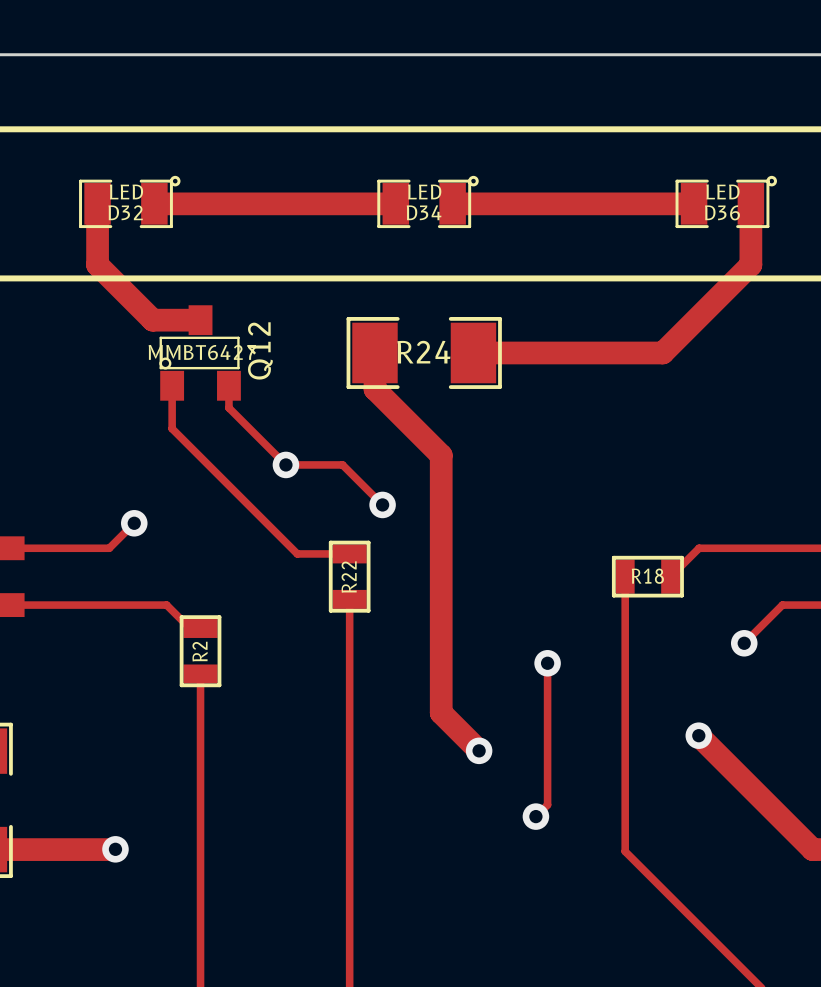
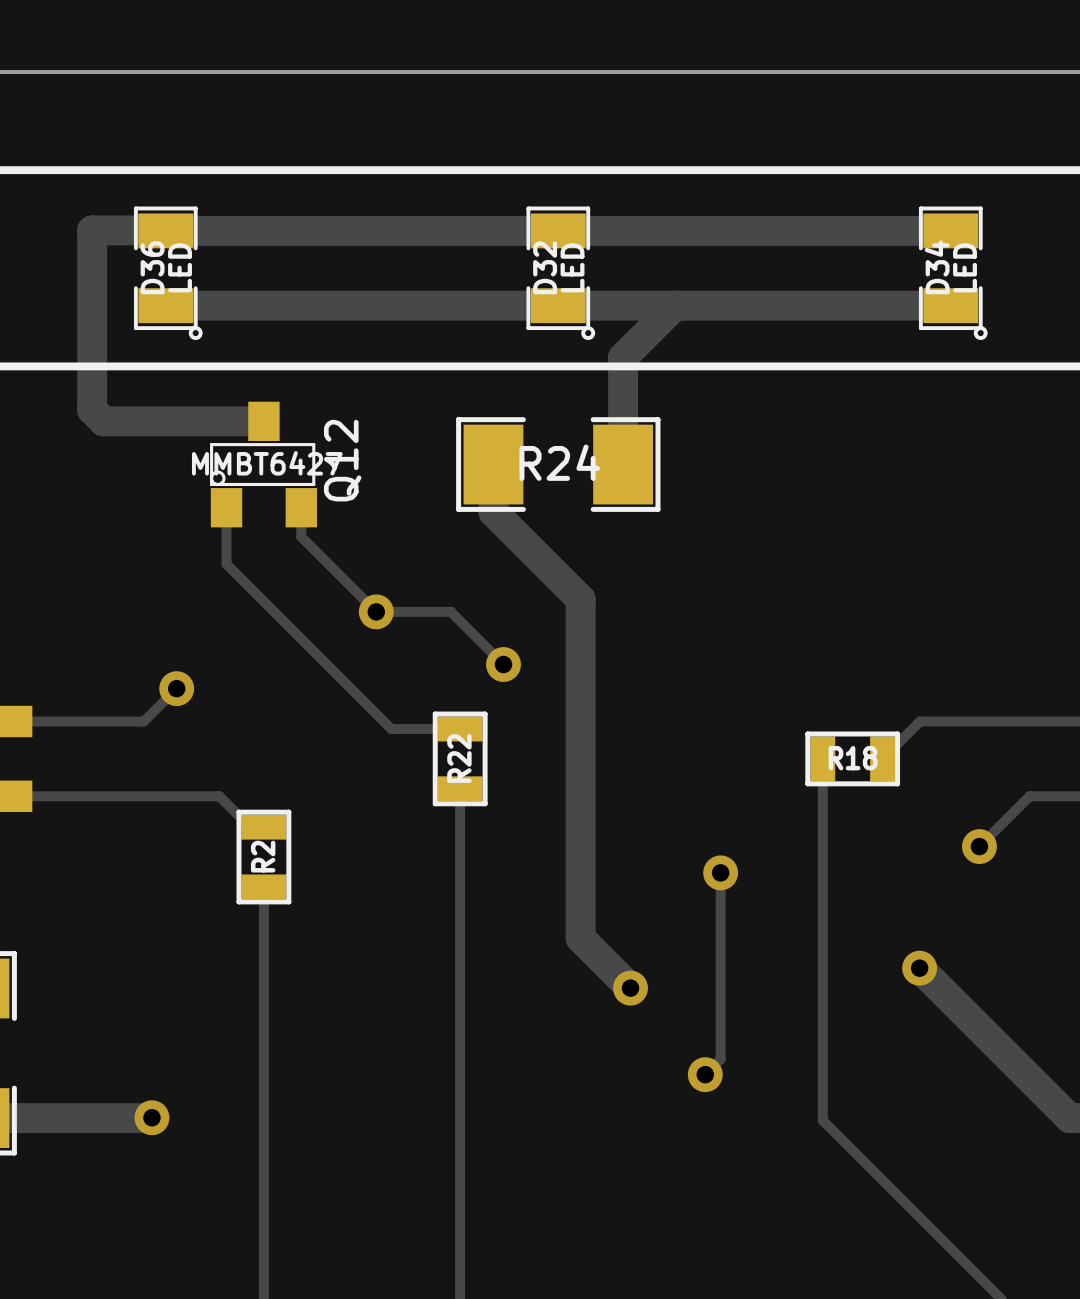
track: none -> (165, 230) (950, 230)
D32 rotation: 0° (129, 201) -> 90° clockwise (560, 273)
D32 position: (129, 201) -> (560, 273)
D34 rotation: 0° (428, 201) -> 90° clockwise (953, 273)
D34 position: (428, 201) -> (953, 273)
D36 rotation: 0° (726, 201) -> 90° clockwise (168, 273)
D36 position: (726, 201) -> (168, 273)
track: (97, 203) (97, 264) (152, 320) -> (165, 230) (92, 230) (92, 409) (103, 421) (201, 421)
track: (154, 203) (395, 203) -> none
track: (452, 203) (694, 203) -> none
track: (750, 203) (750, 264) (662, 352) (473, 352) -> (674, 305) (623, 357) (623, 464)
track: none -> (165, 305) (950, 305)

